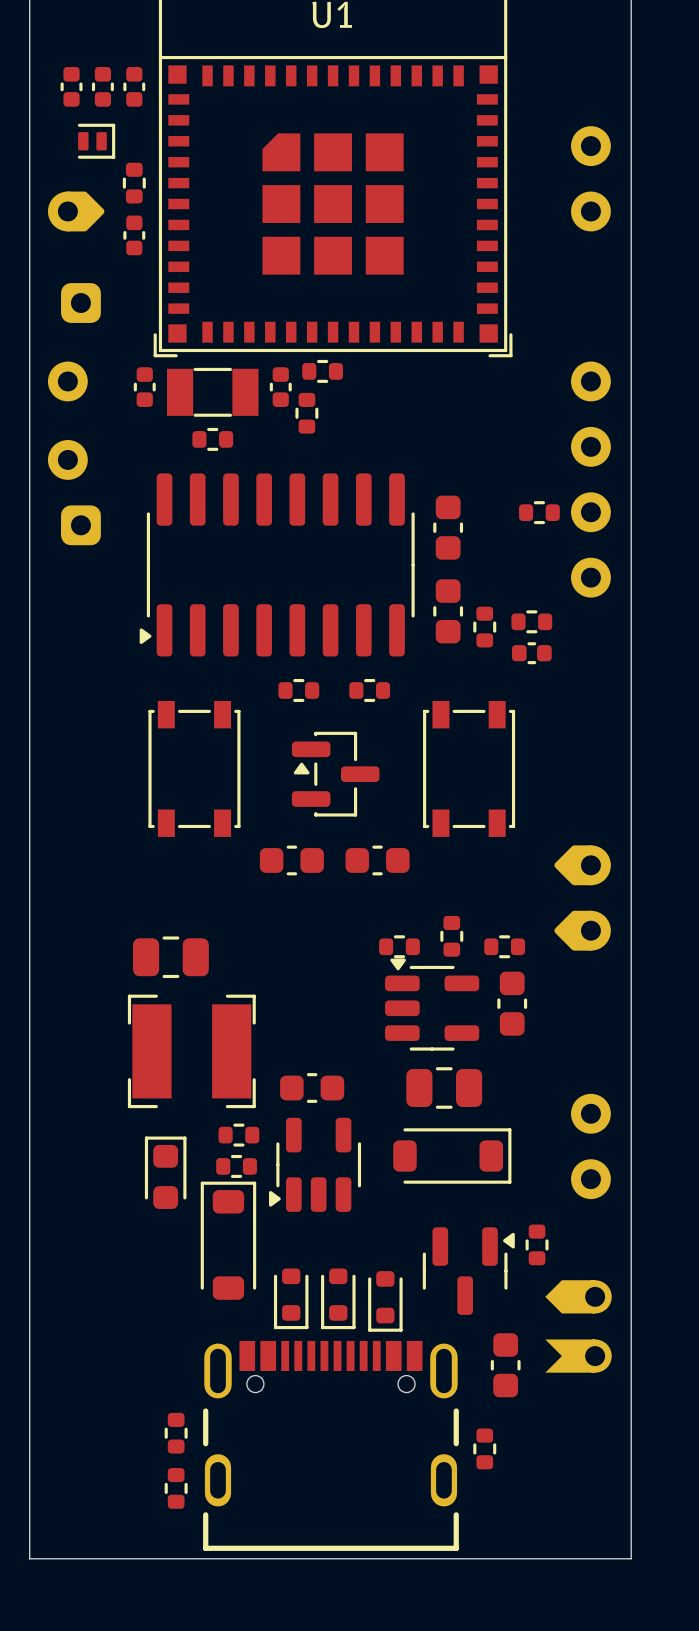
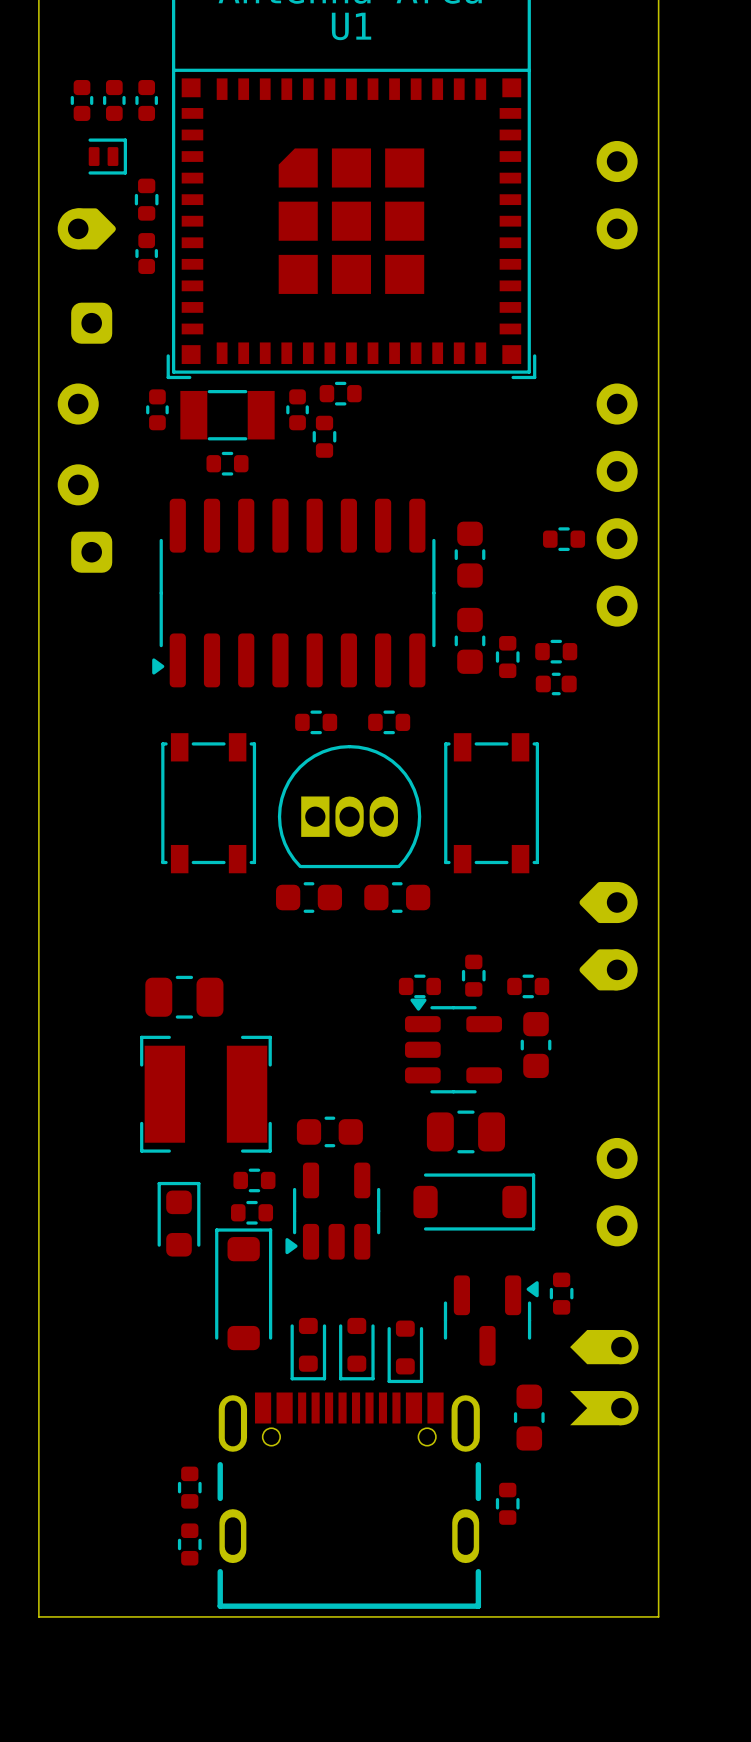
part footprint: [291, 731, 380, 817] -> [277, 745, 422, 869]

